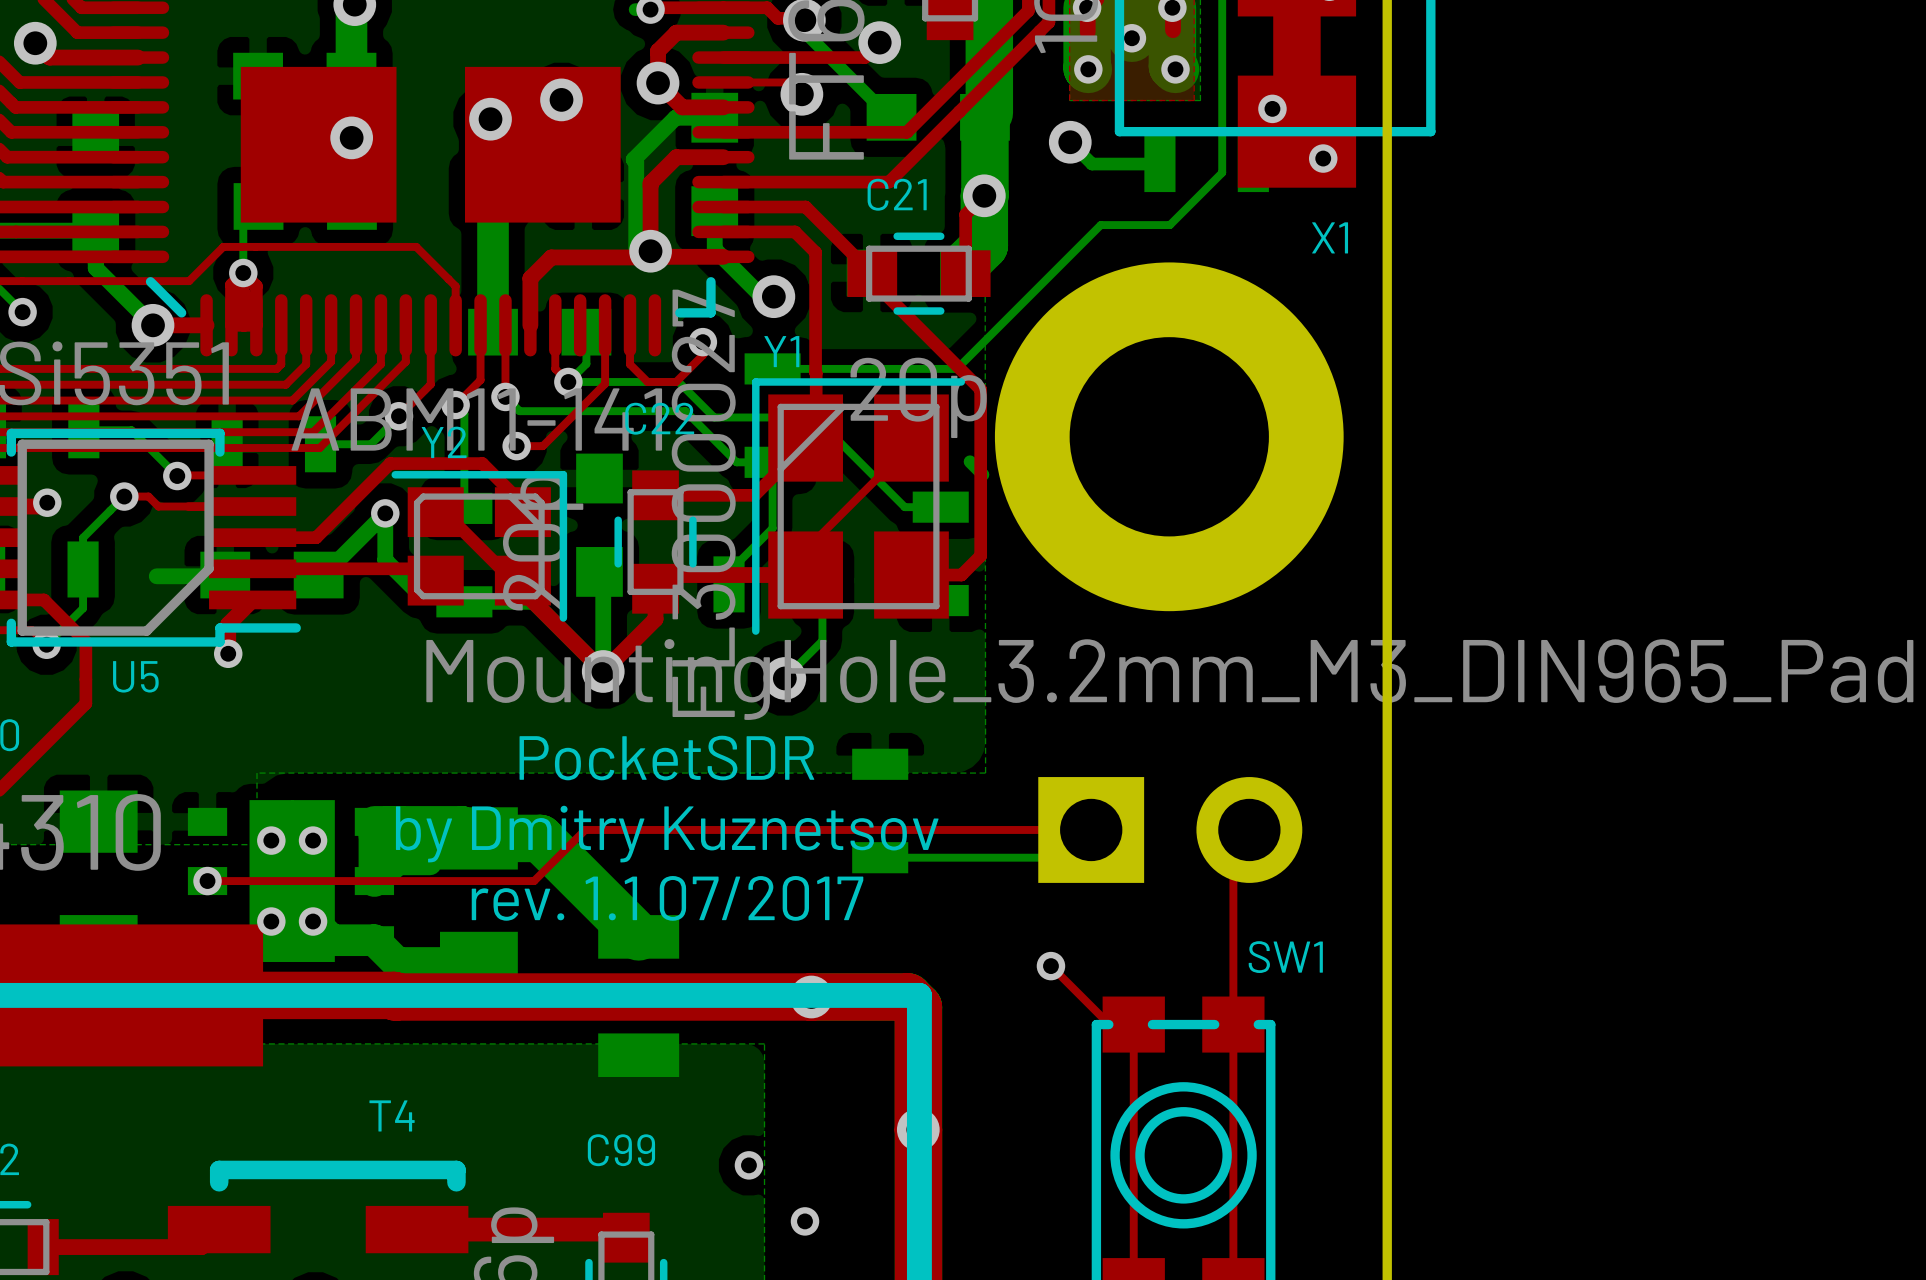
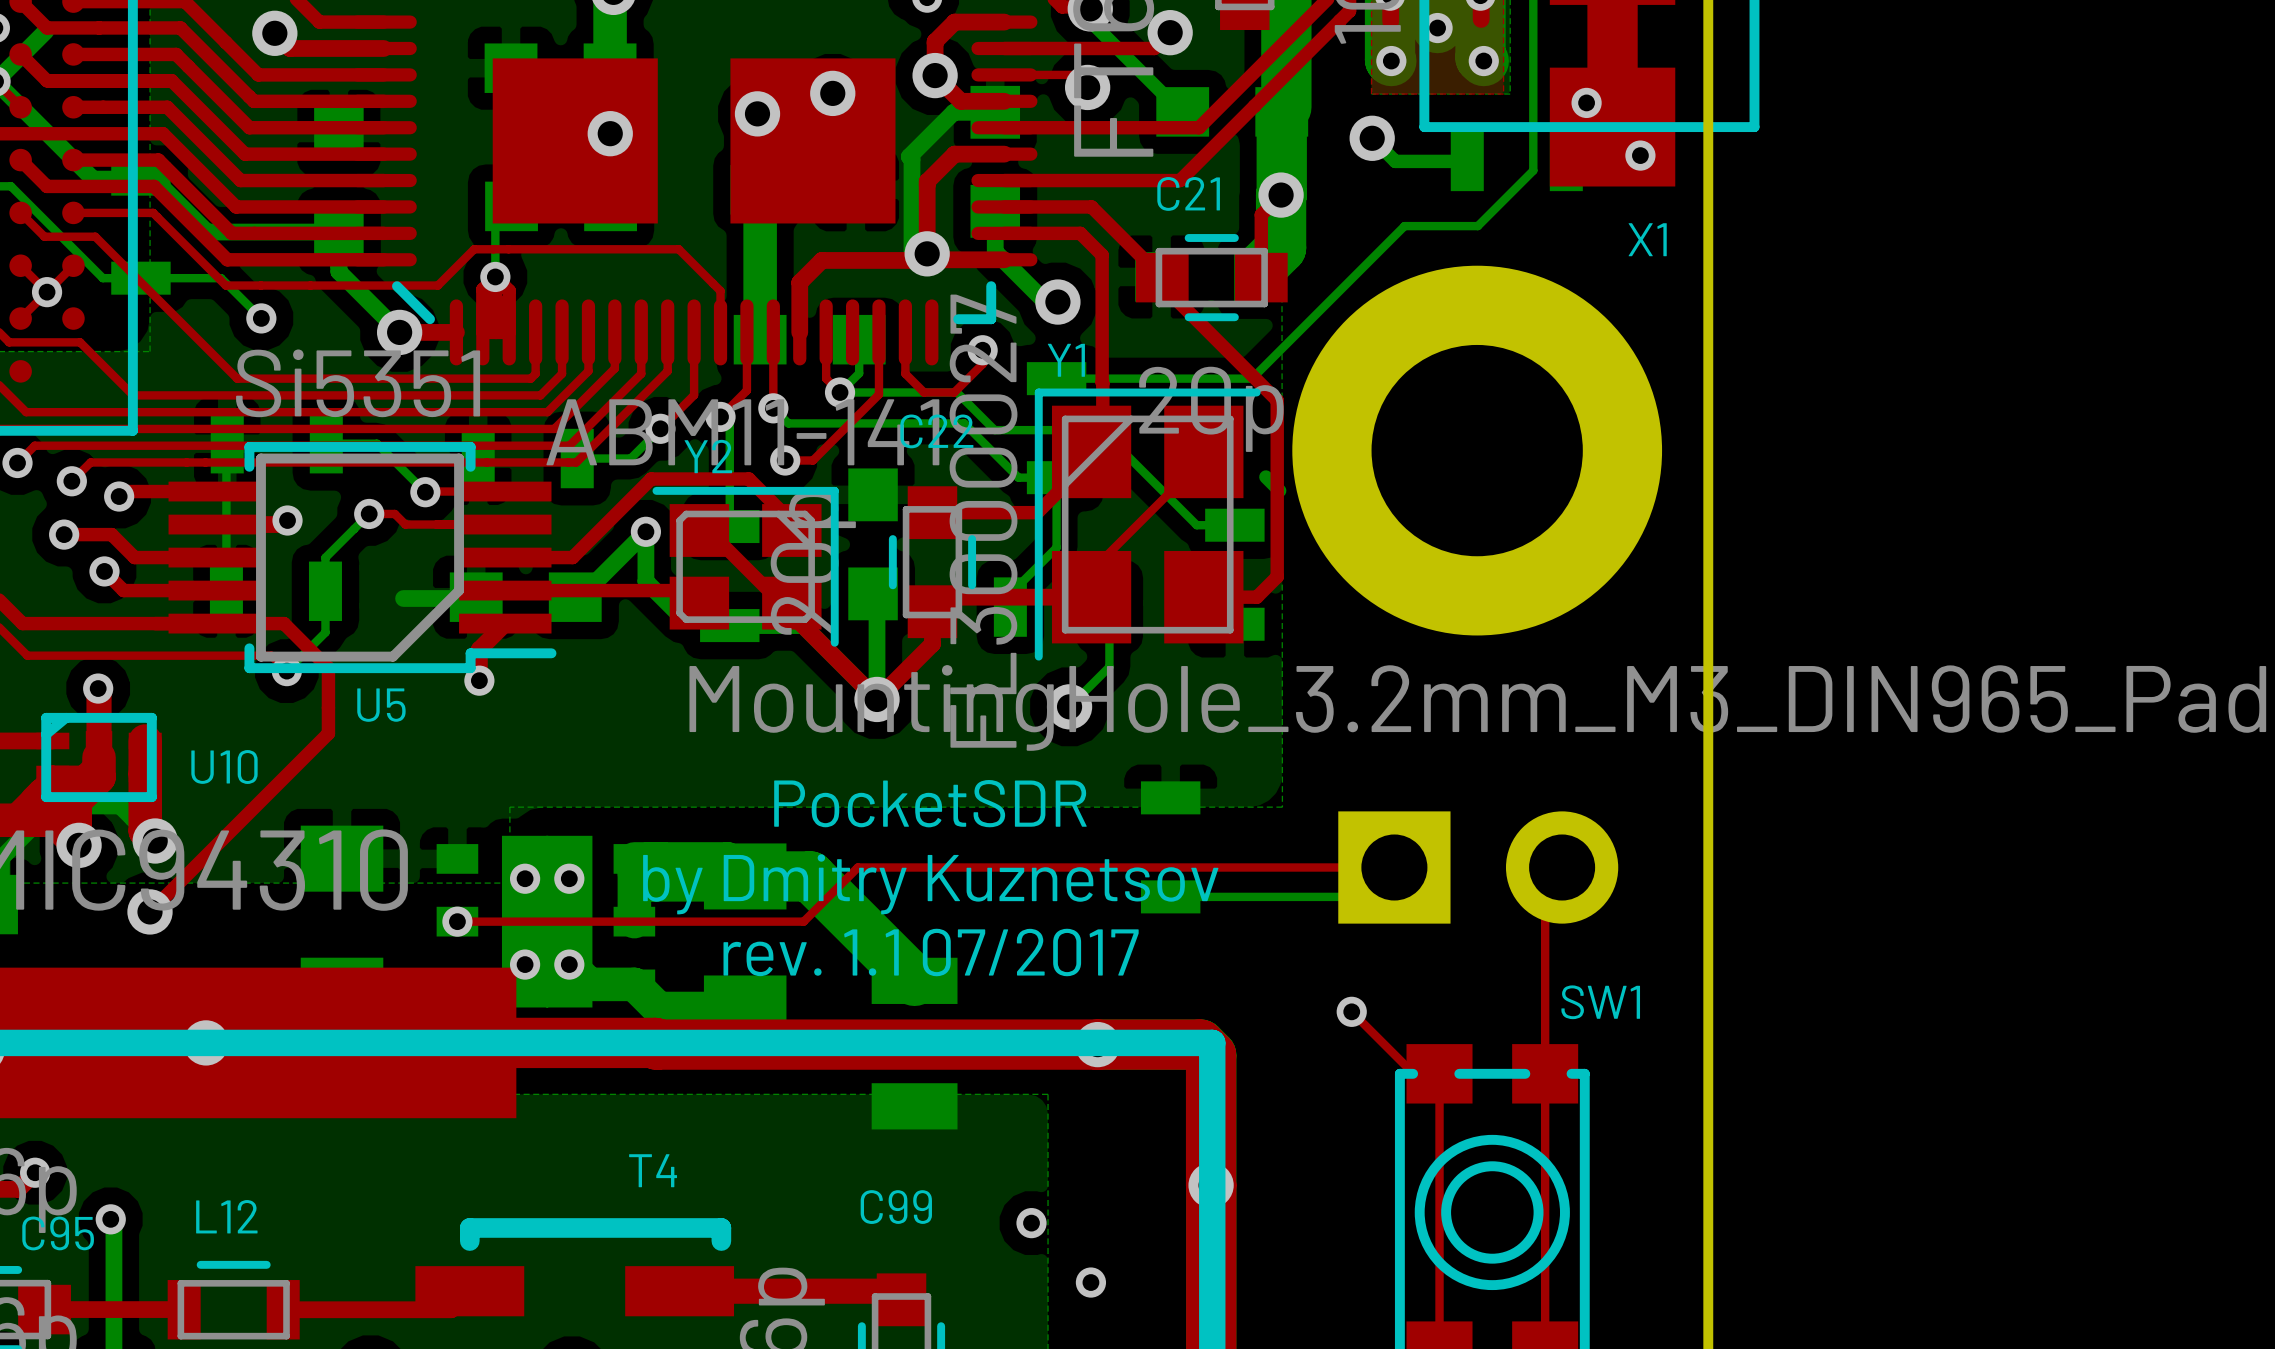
text position: PocketSDR (666, 758) -> PocketSDR (930, 803)
text position: by Dmitry Kuznetsov (667, 834) -> by Dmitry Kuznetsov (930, 884)
bottom track: (429, 863) (397, 863) (380, 881) (374, 881) -> none
text position: rev. 1.1 07/2017 (667, 898) -> rev. 1.1 07/2017 (931, 952)

